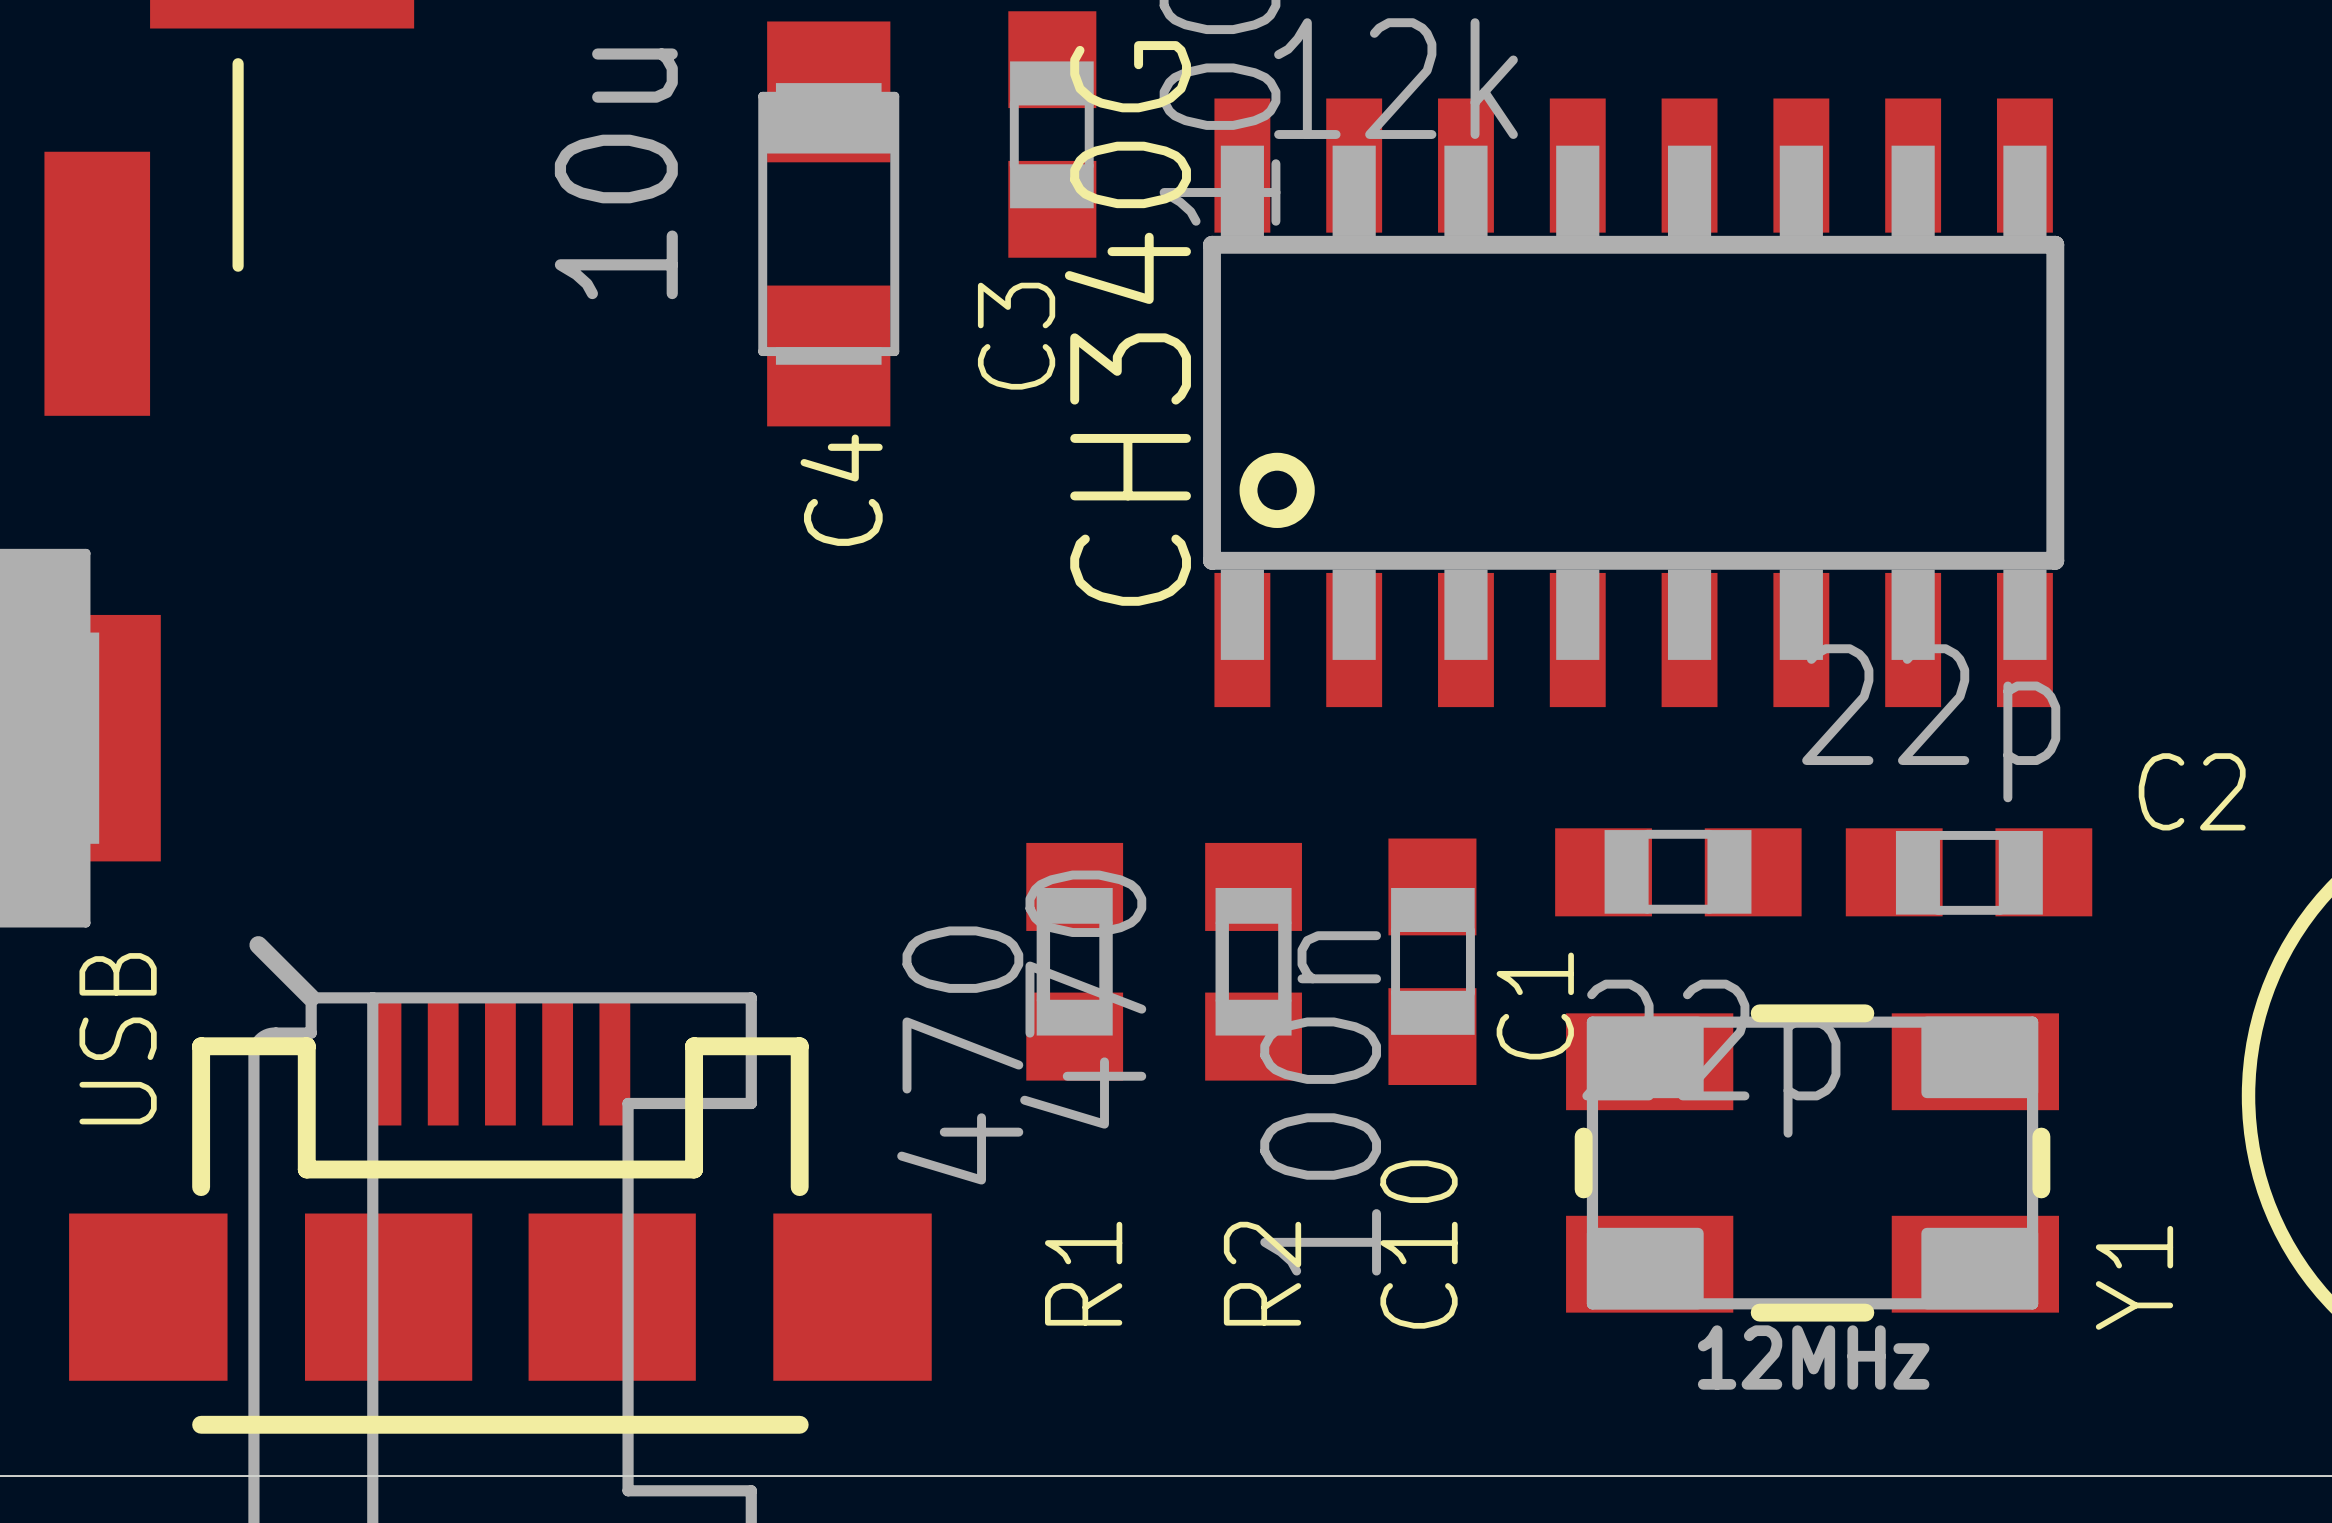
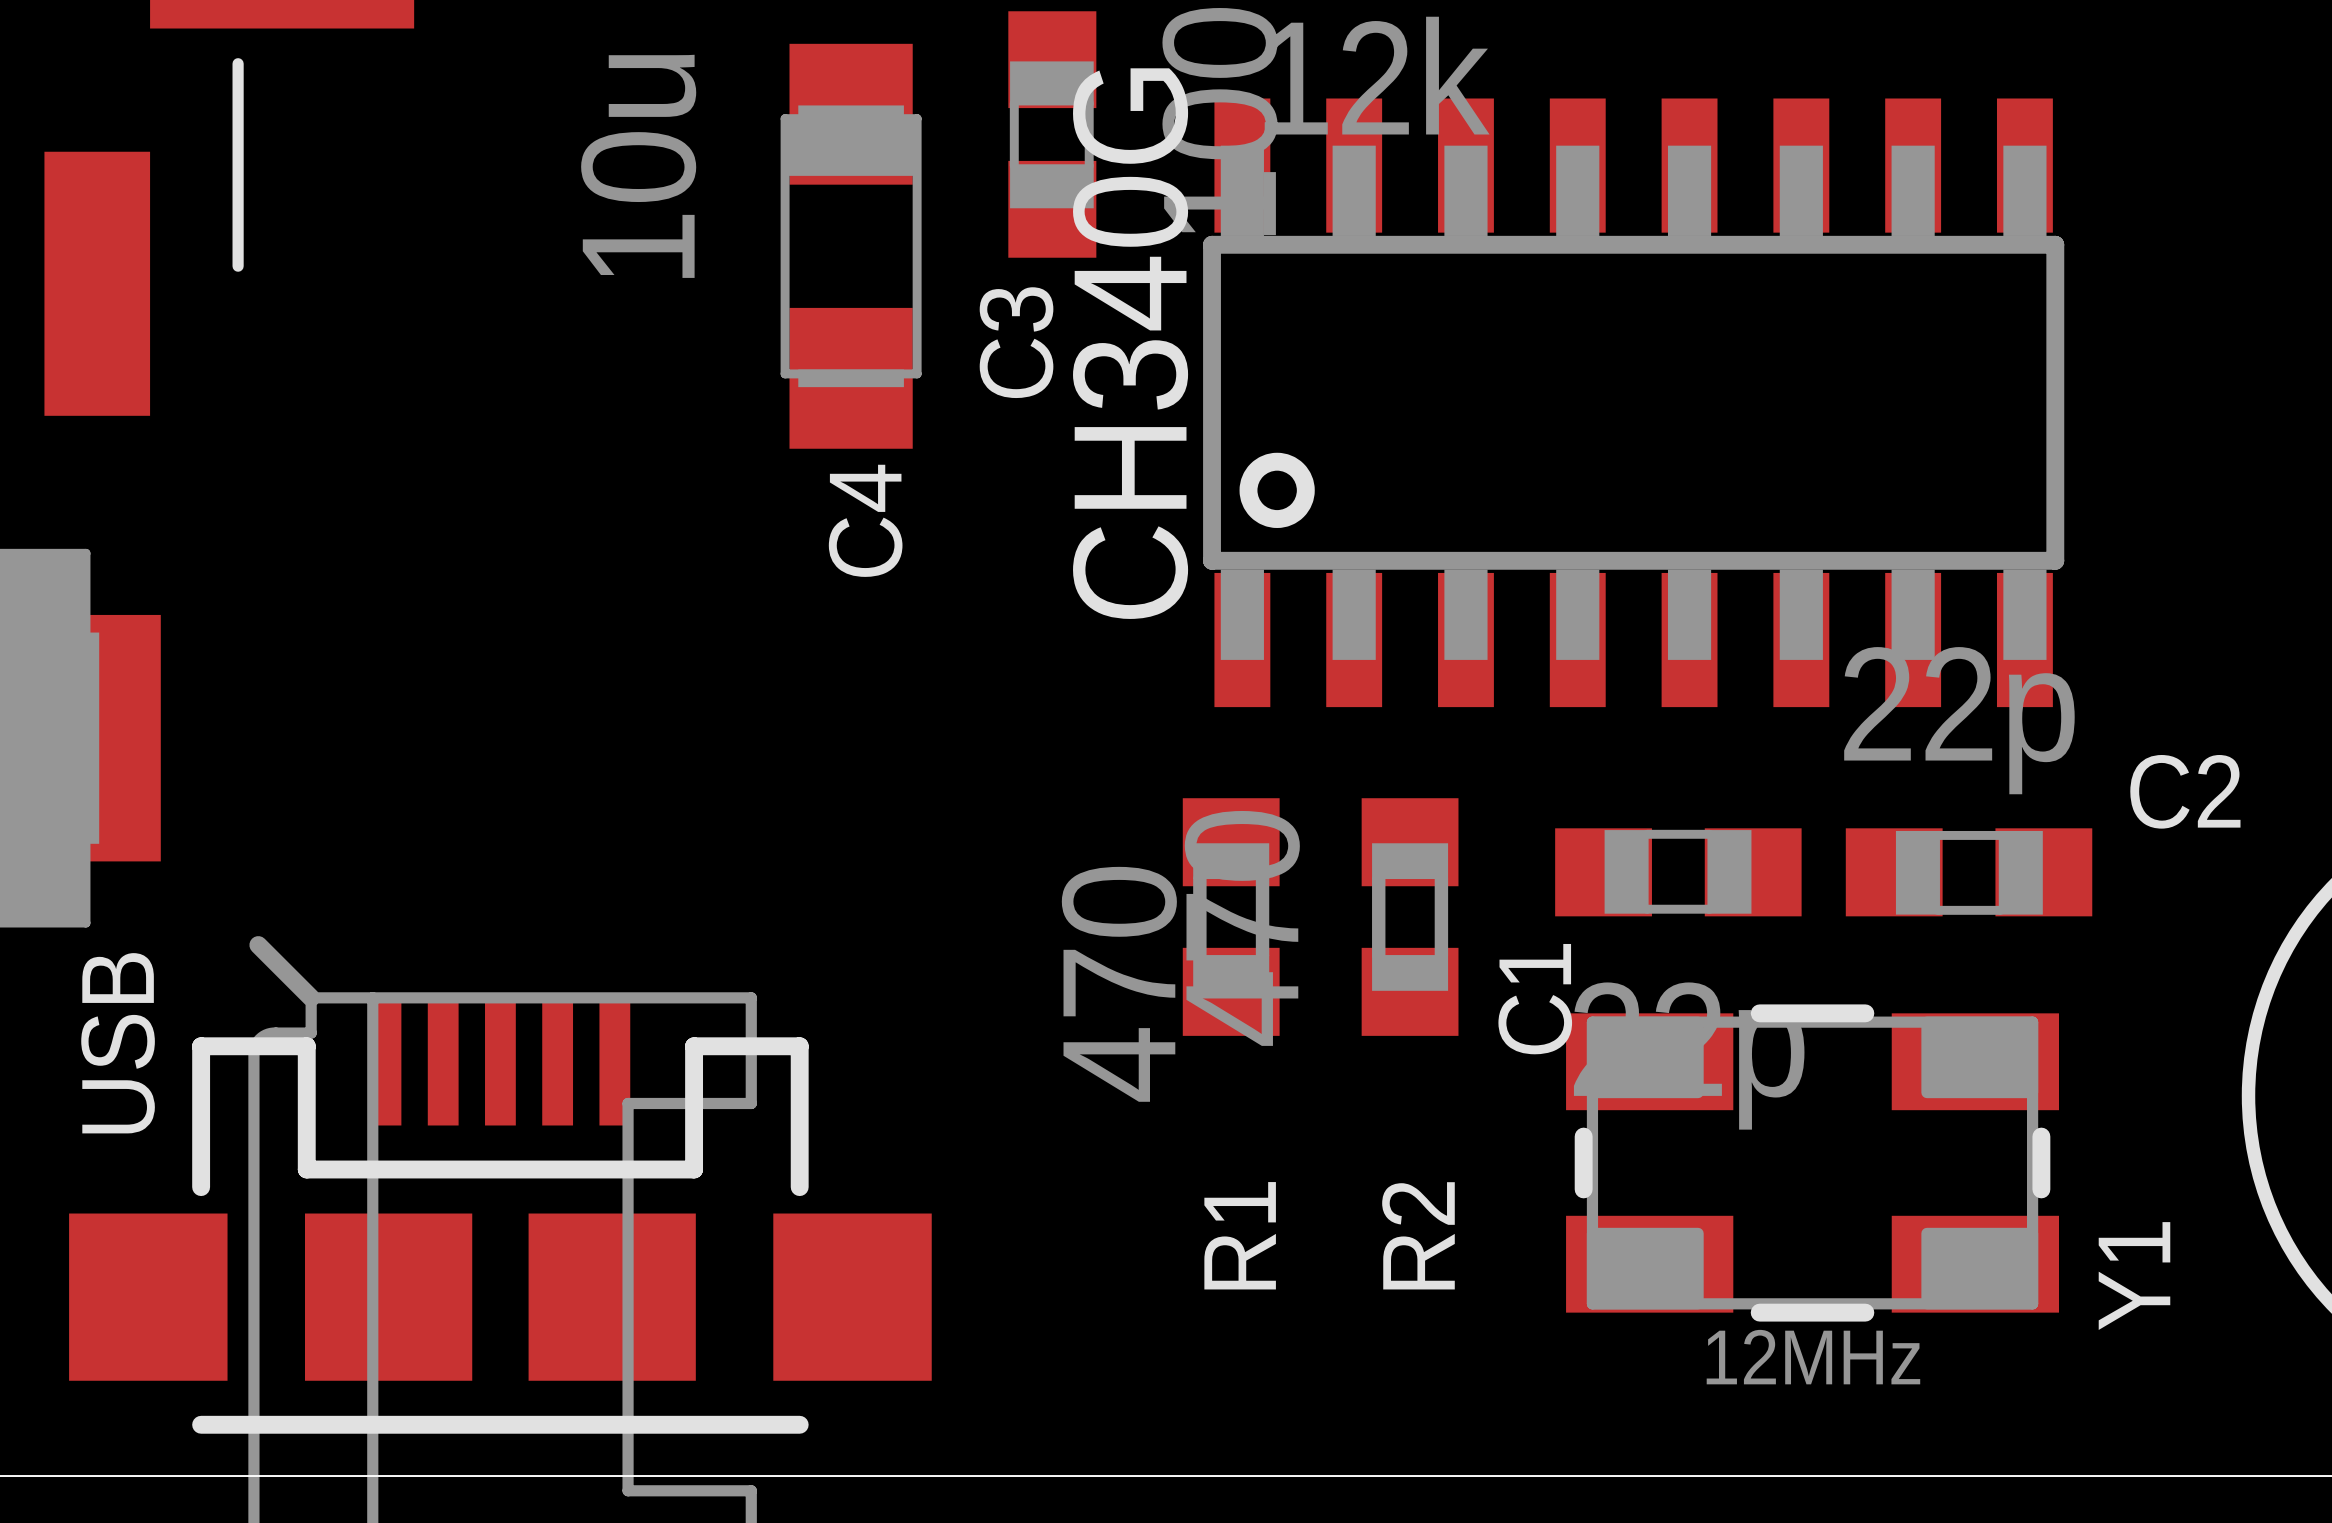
C4 position: (828, 223) -> (851, 246)
R1 position: (1074, 961) -> (1231, 917)
R2 position: (1253, 961) -> (1410, 917)
C10: 100n (1432, 961) -> none

